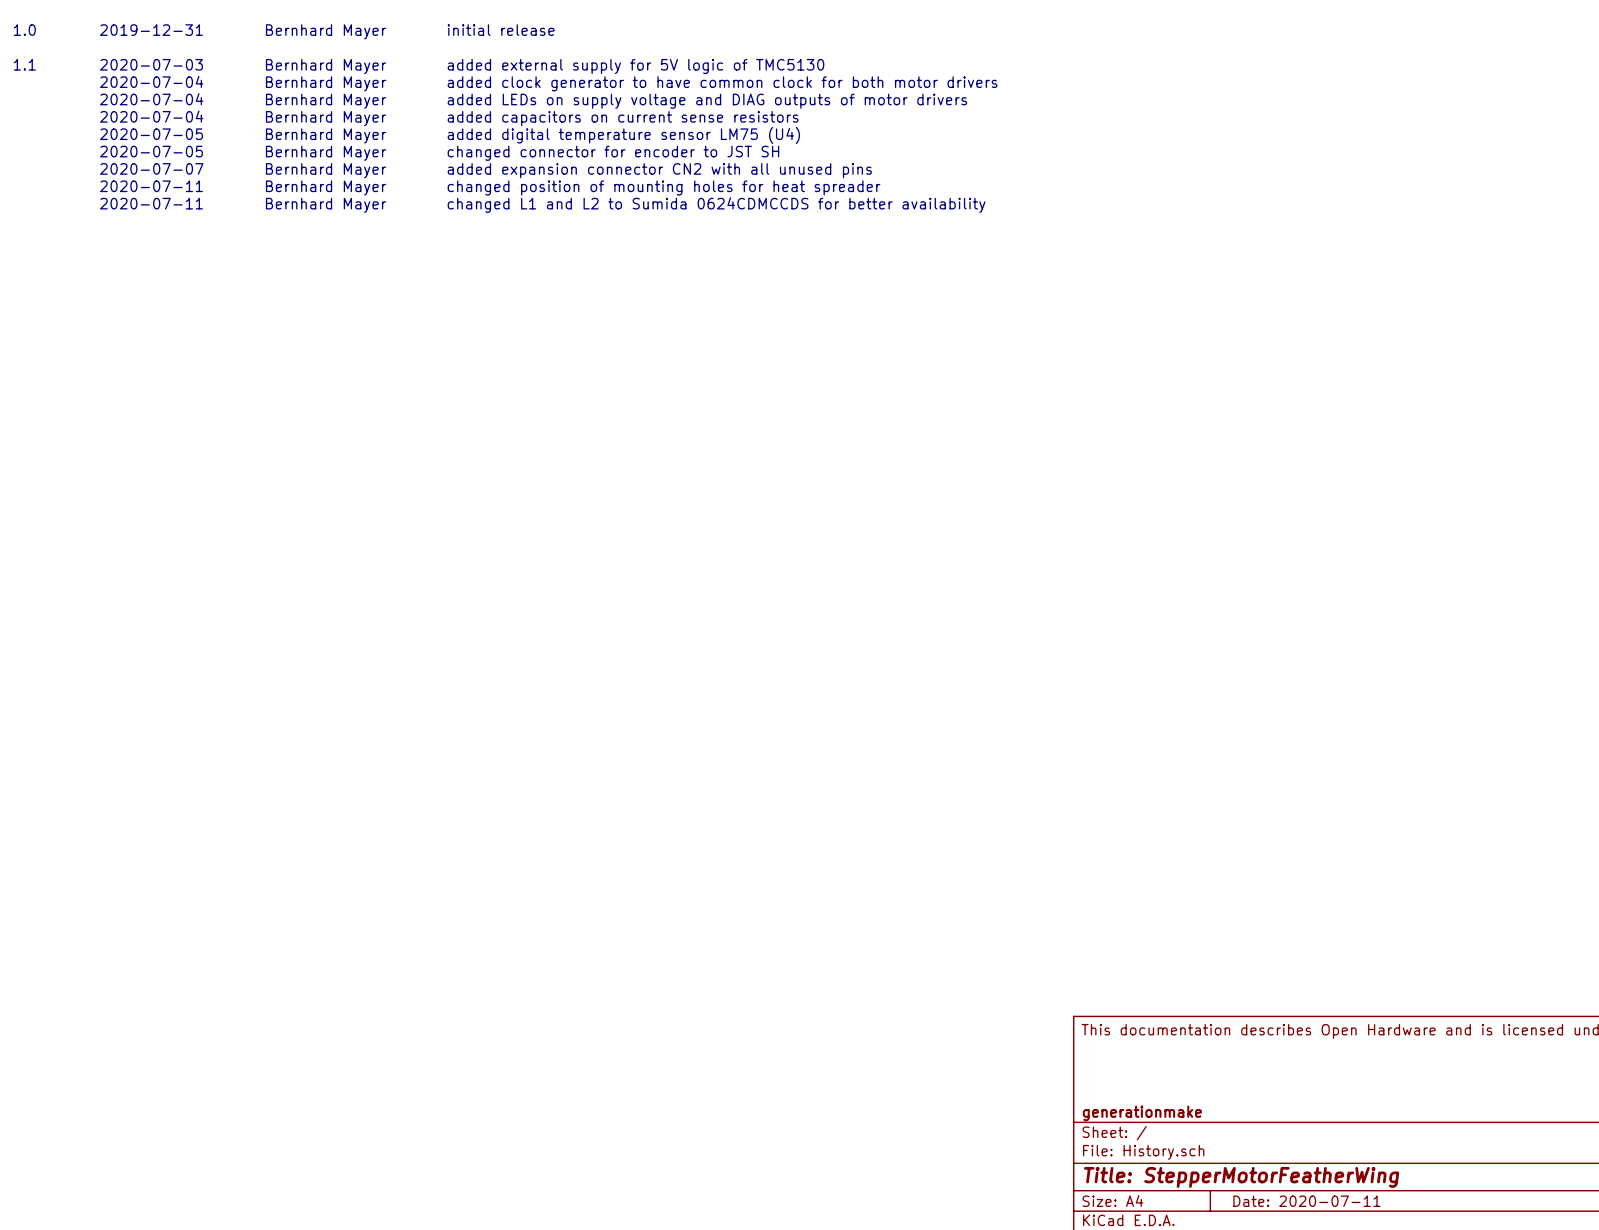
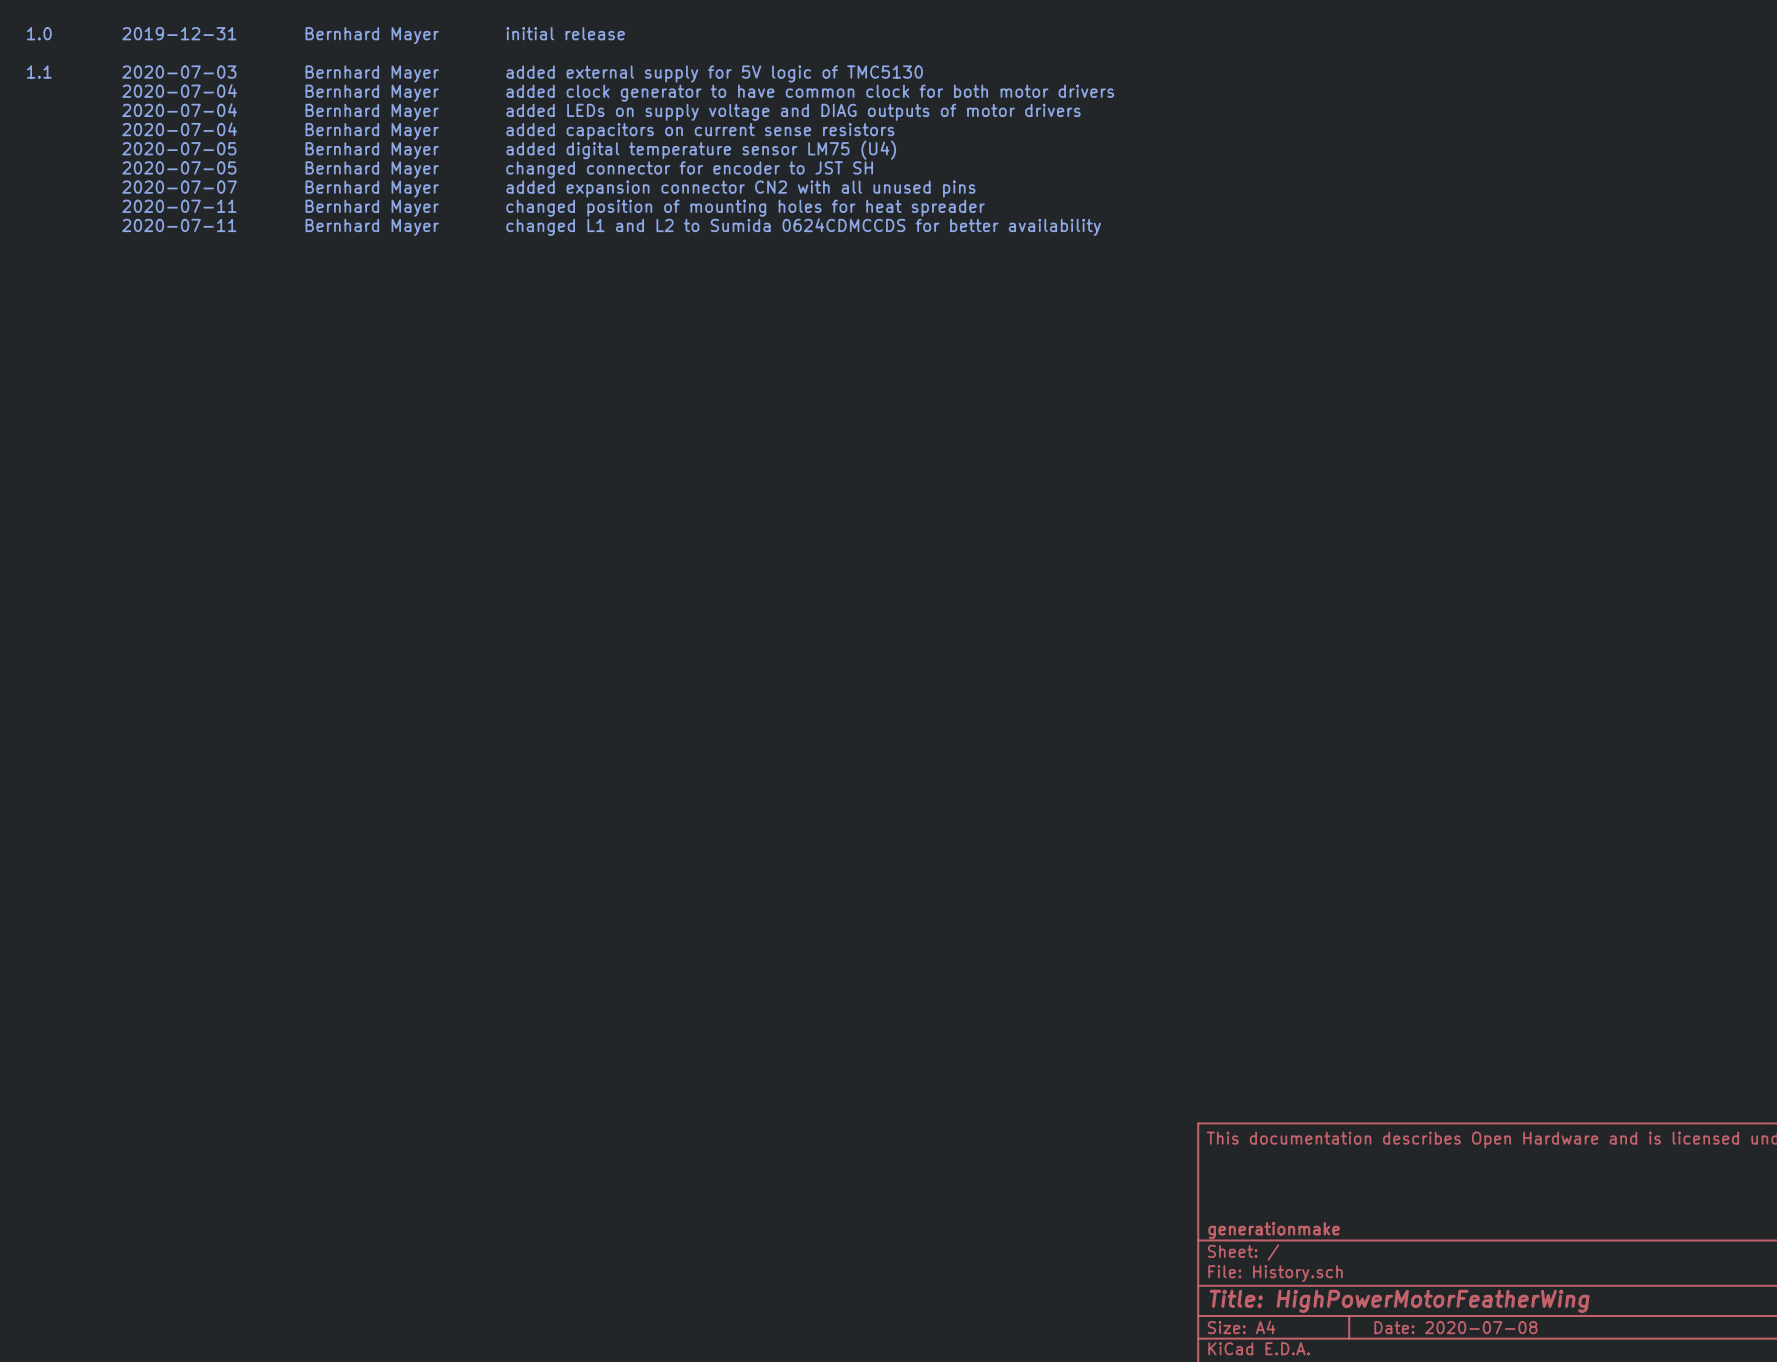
title block: Title: StepperMotorFeatherWing (1241, 1177) -> Title: HighPowerMotorFeatherWing (1399, 1301)
title block: Date: 2020-07-11 (1306, 1201) -> Date: 2020-07-08 (1455, 1327)

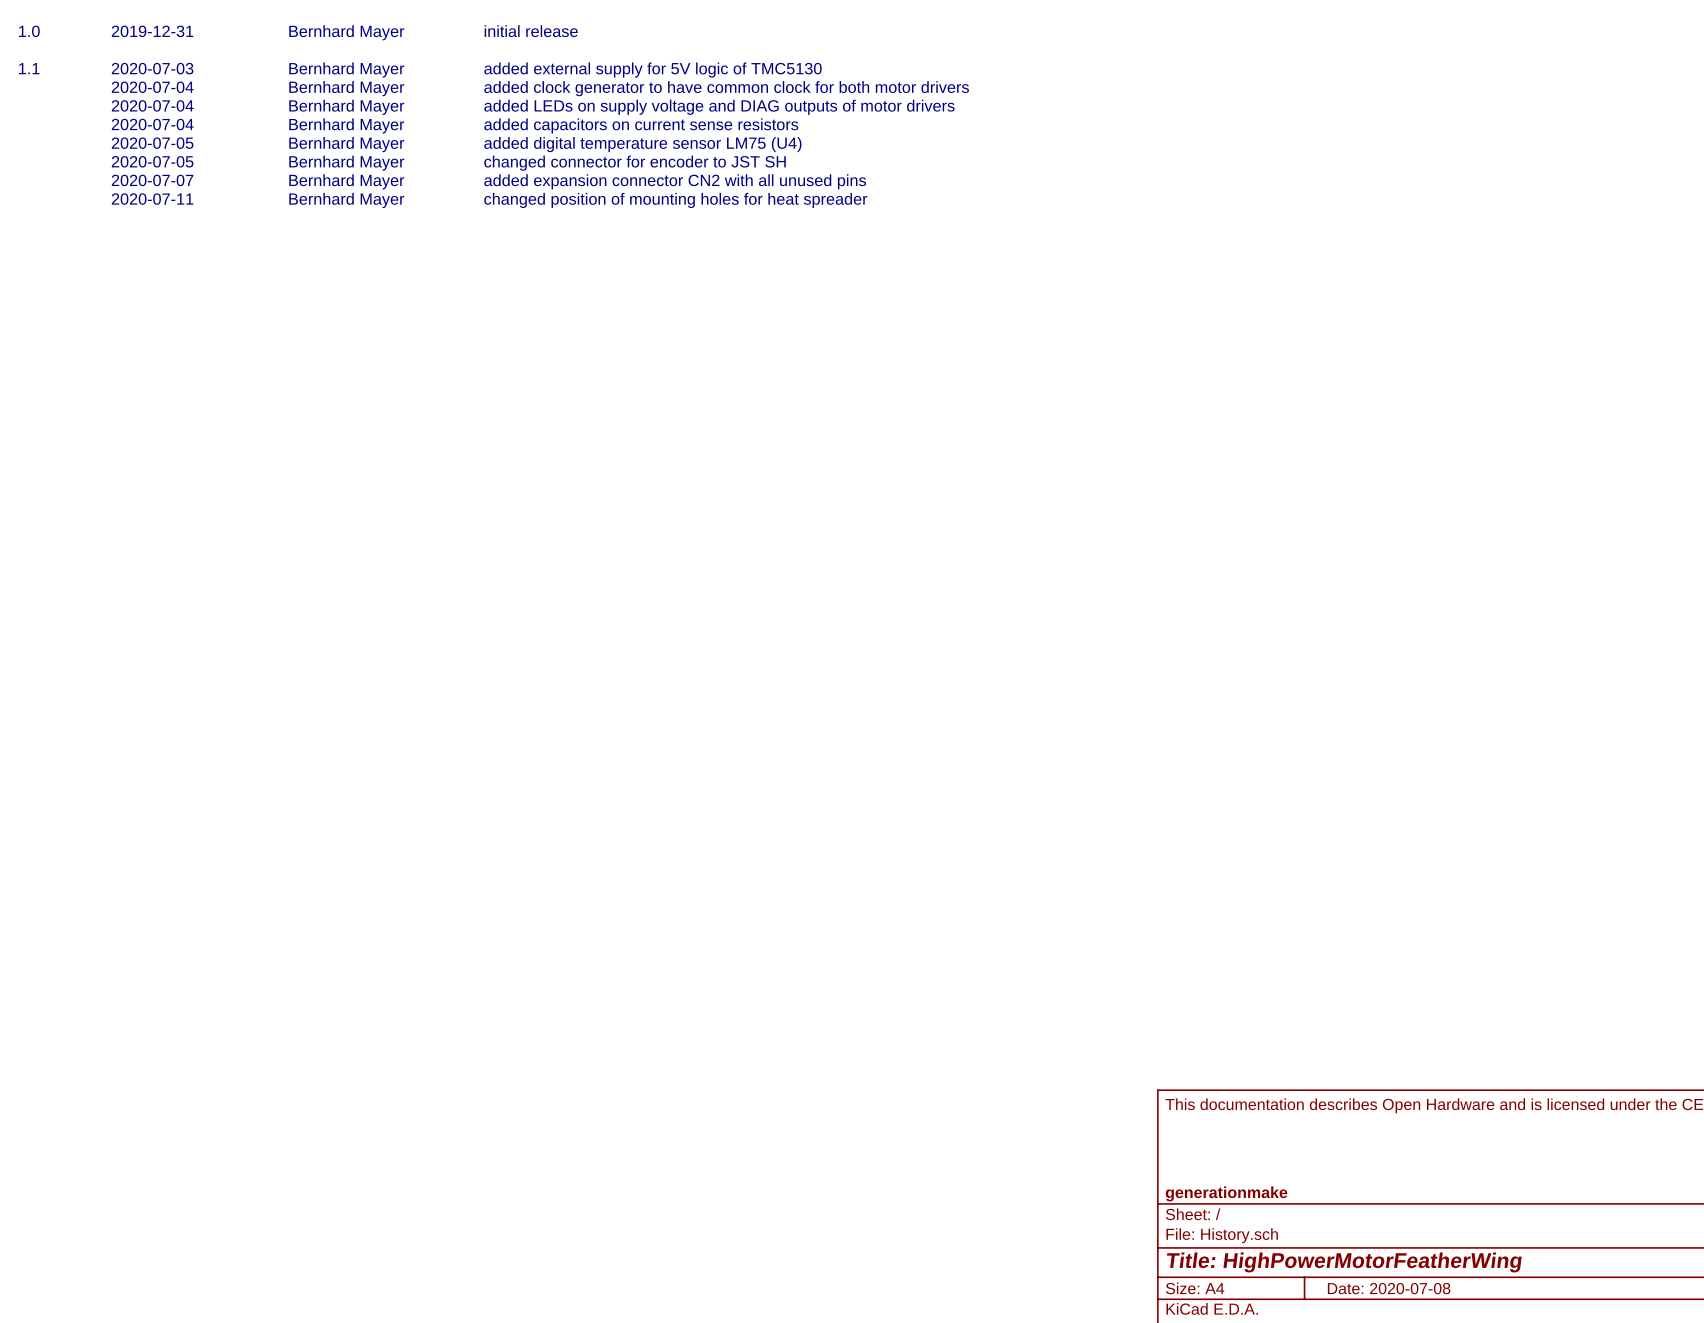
text: 2020-07-11 (179, 225) -> none
text: Bernhard Mayer (372, 227) -> none
text: changed L1 and L2 to Sumida 0624CDMCCDS for better availability (803, 227) -> none

